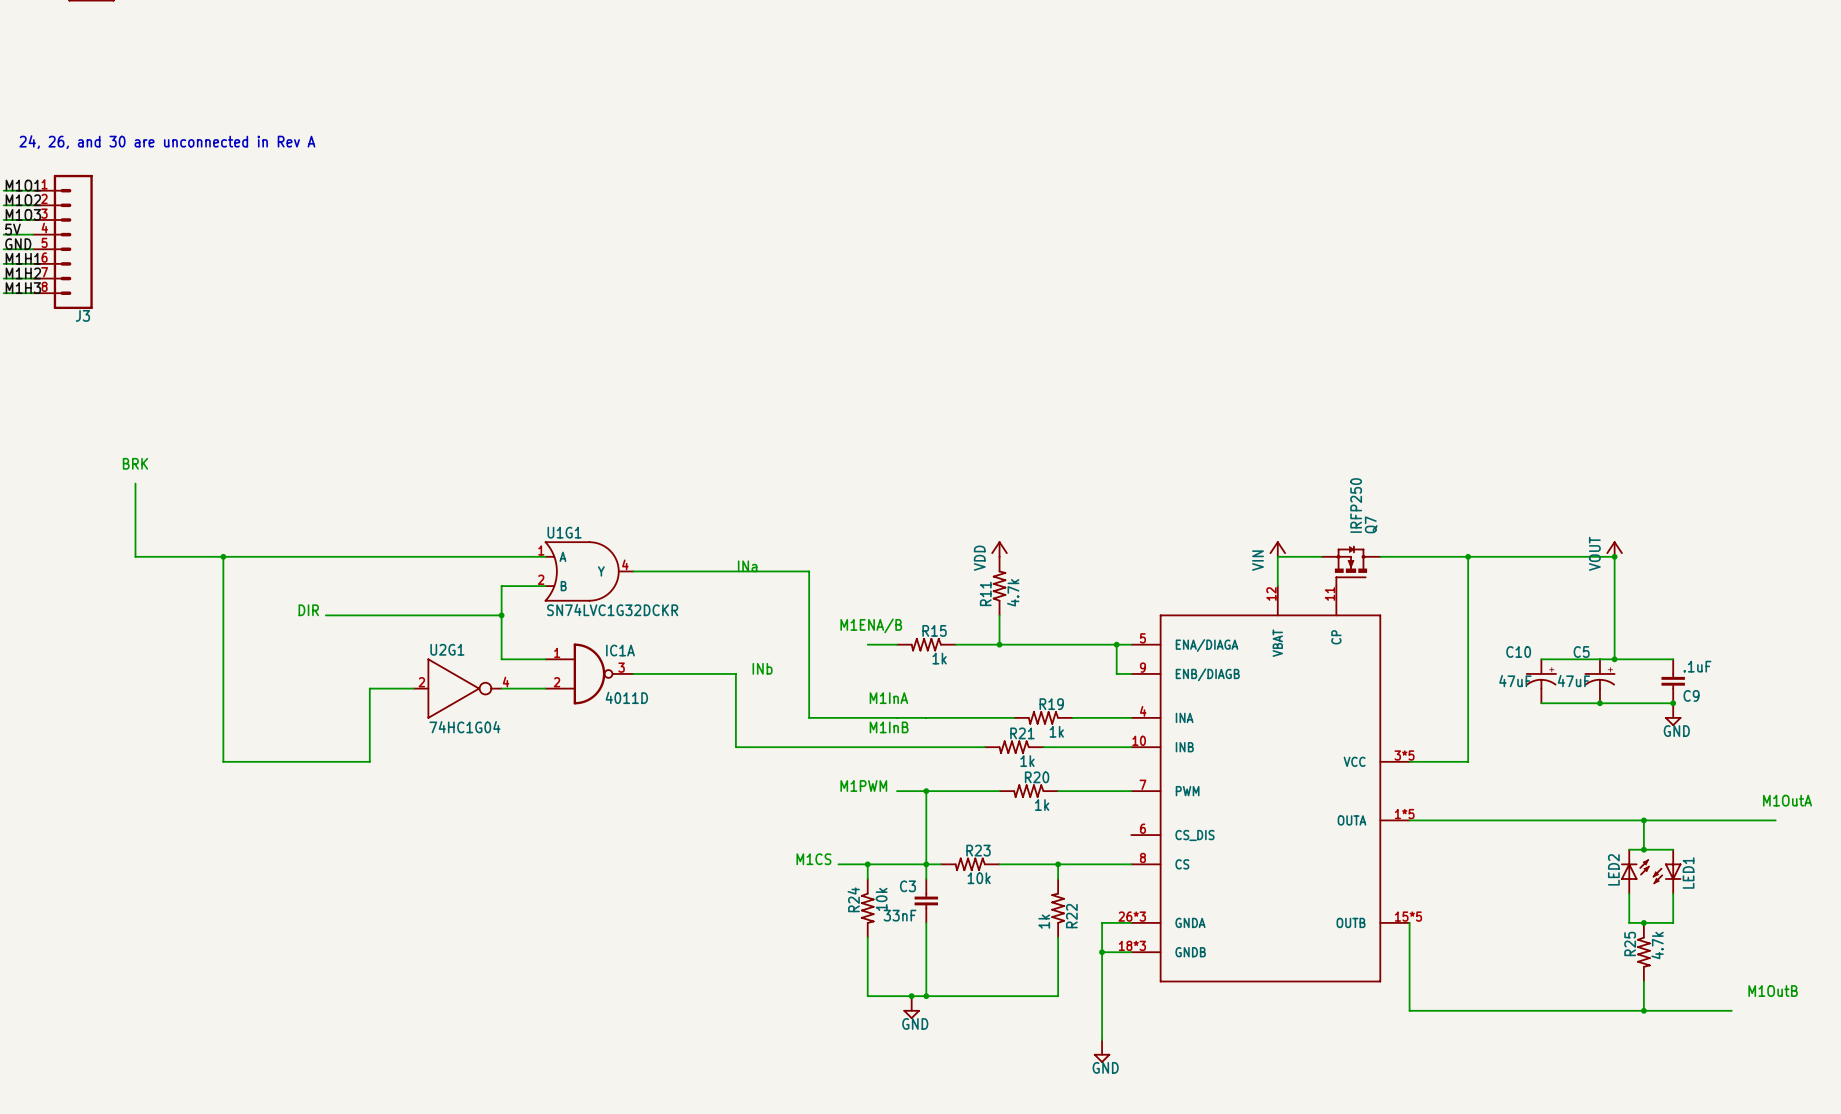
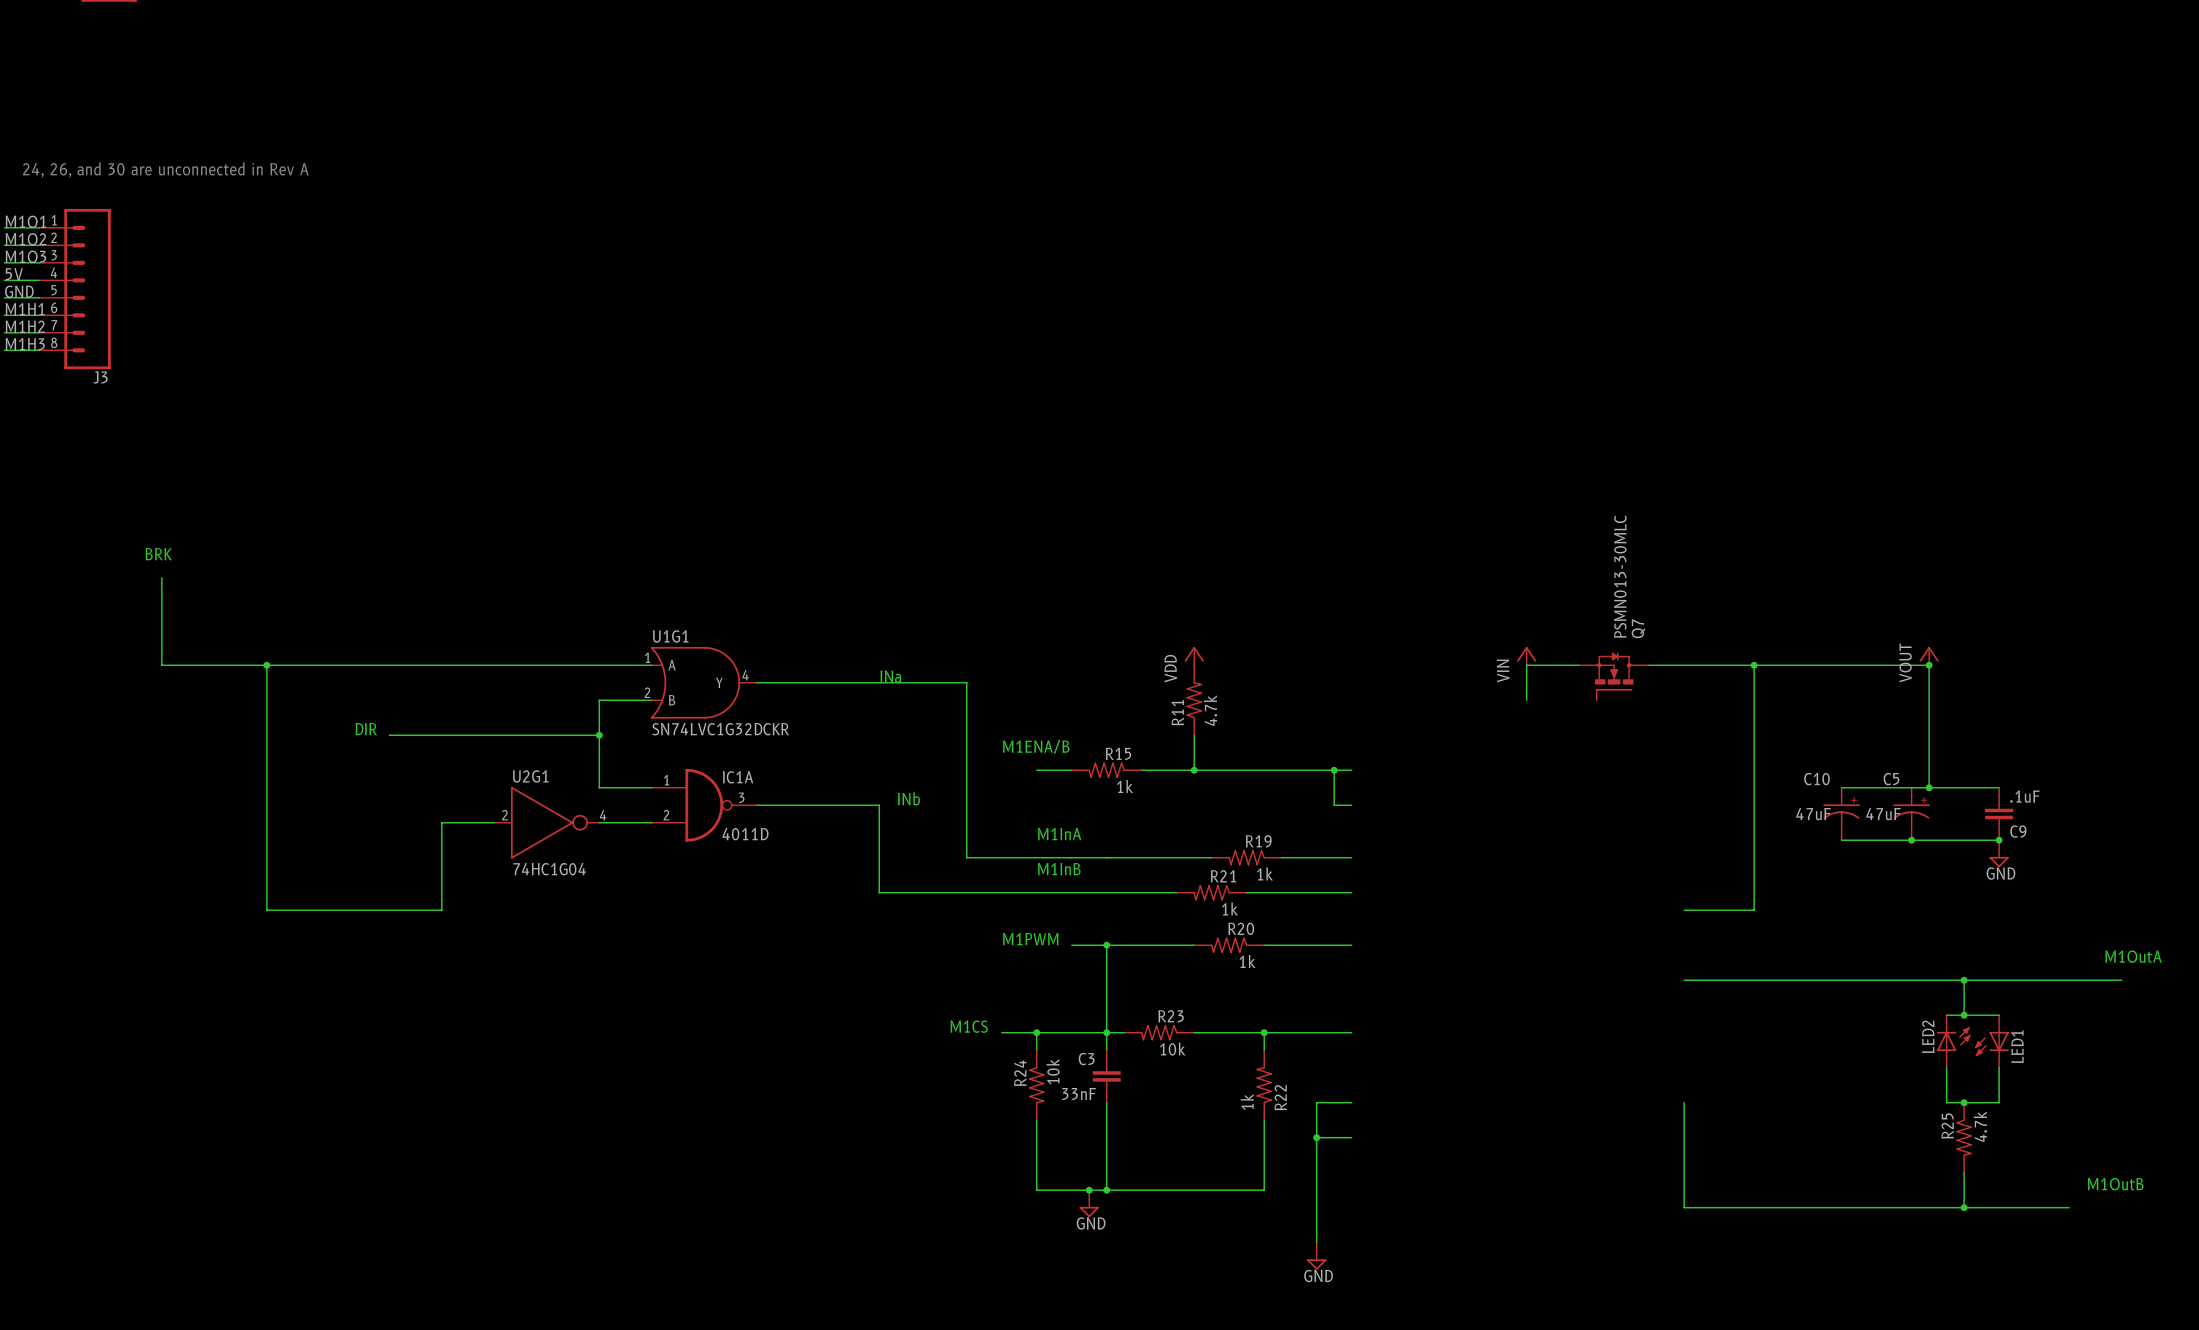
Q7 value: IRFP250 (1356, 505) -> PSMN013-30MLC (1620, 576)
part: (1270, 784) -> none

